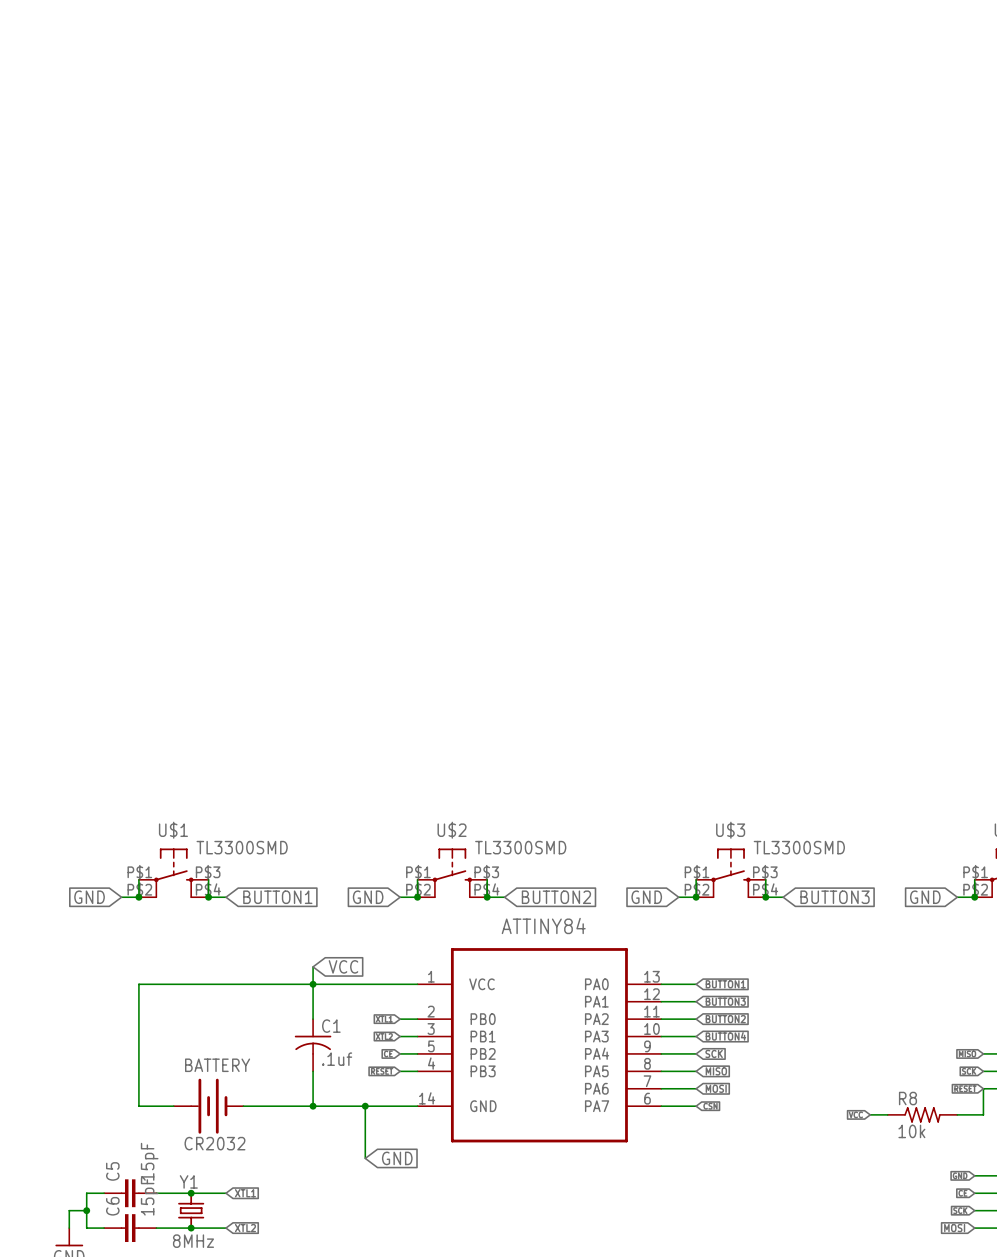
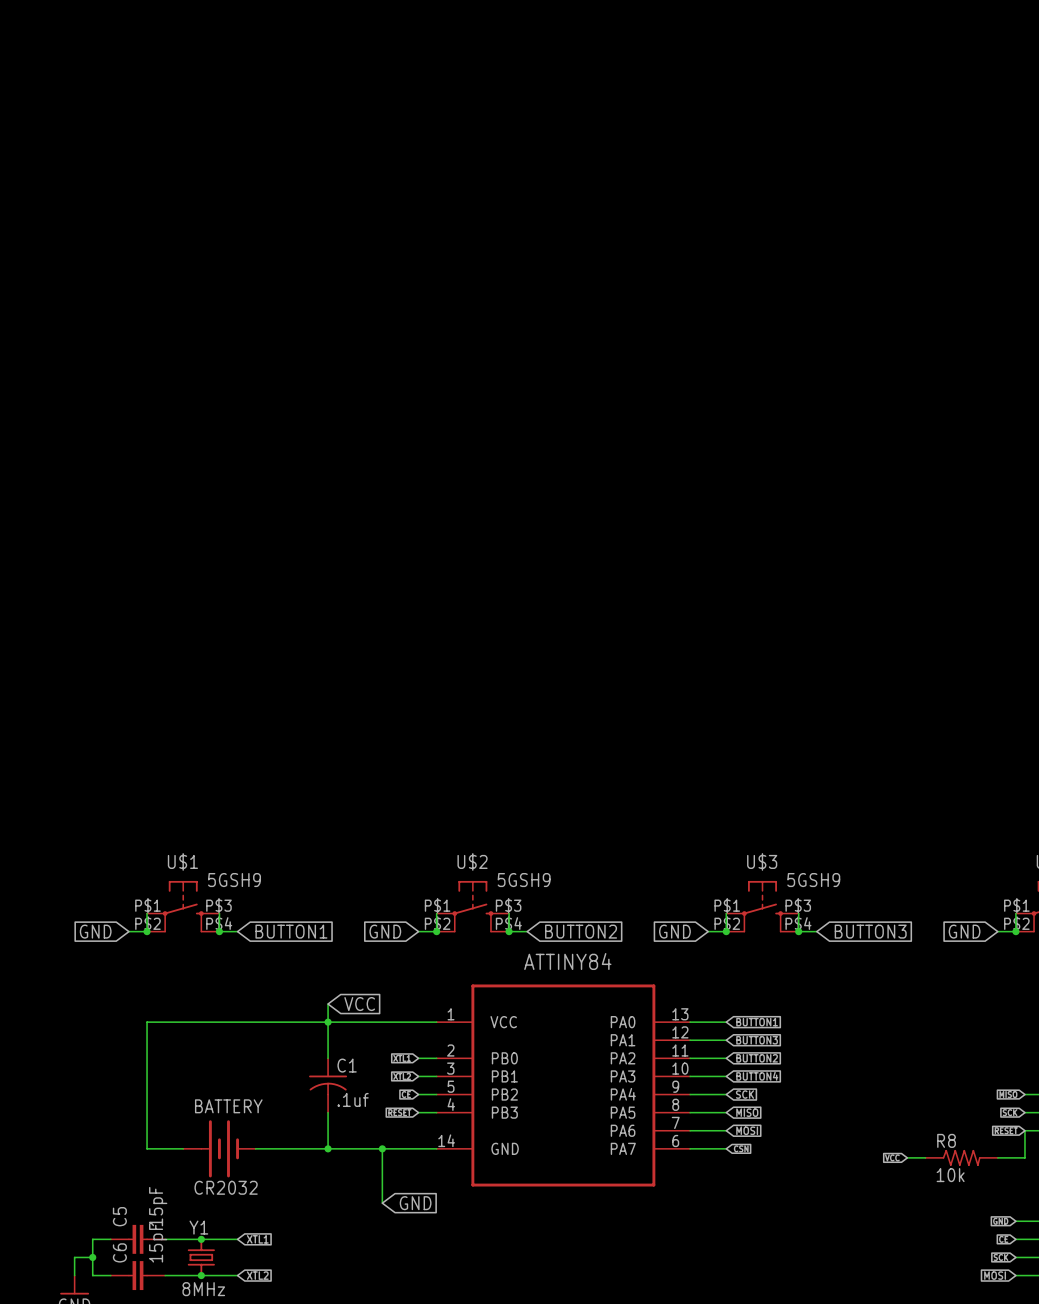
U$1 value: TL3300SMD (242, 847) -> 5GSH9 (234, 880)
U$2 value: TL3300SMD (520, 847) -> 5GSH9 (524, 880)
U$3 value: TL3300SMD (799, 847) -> 5GSH9 (813, 880)

